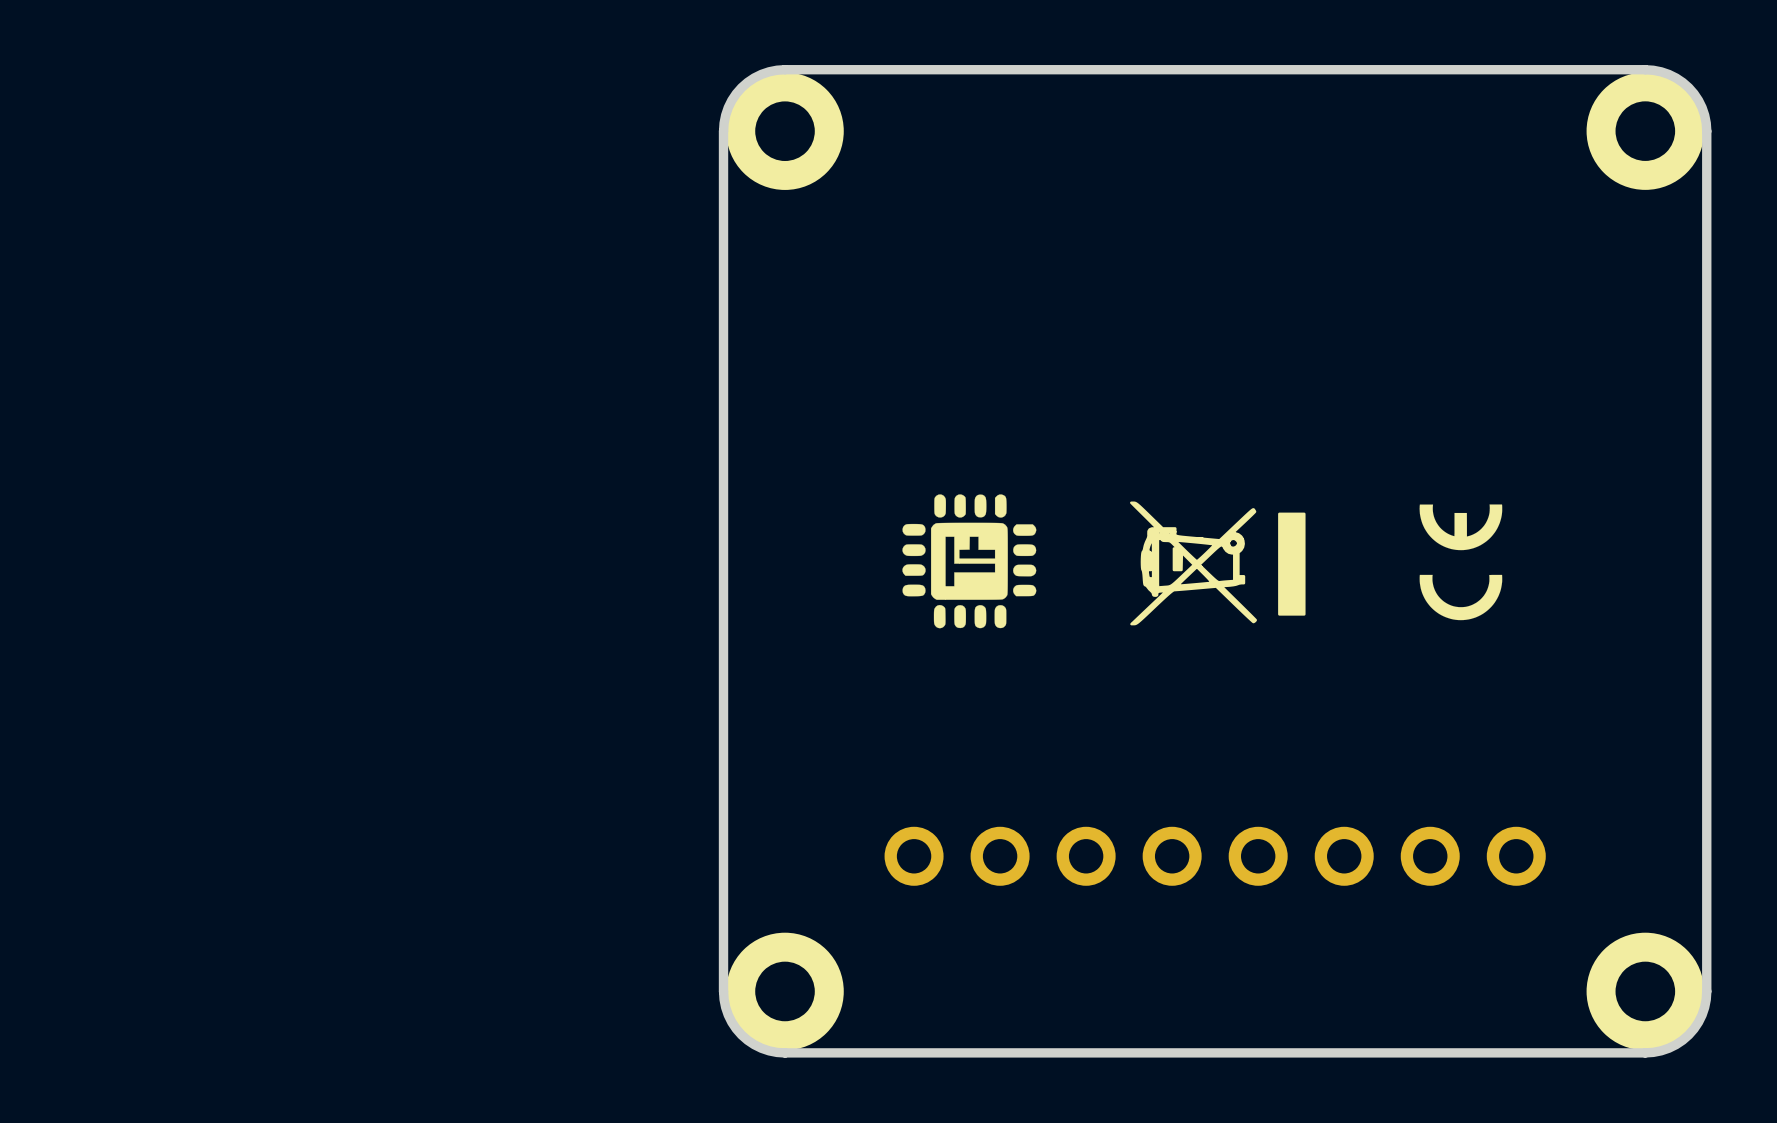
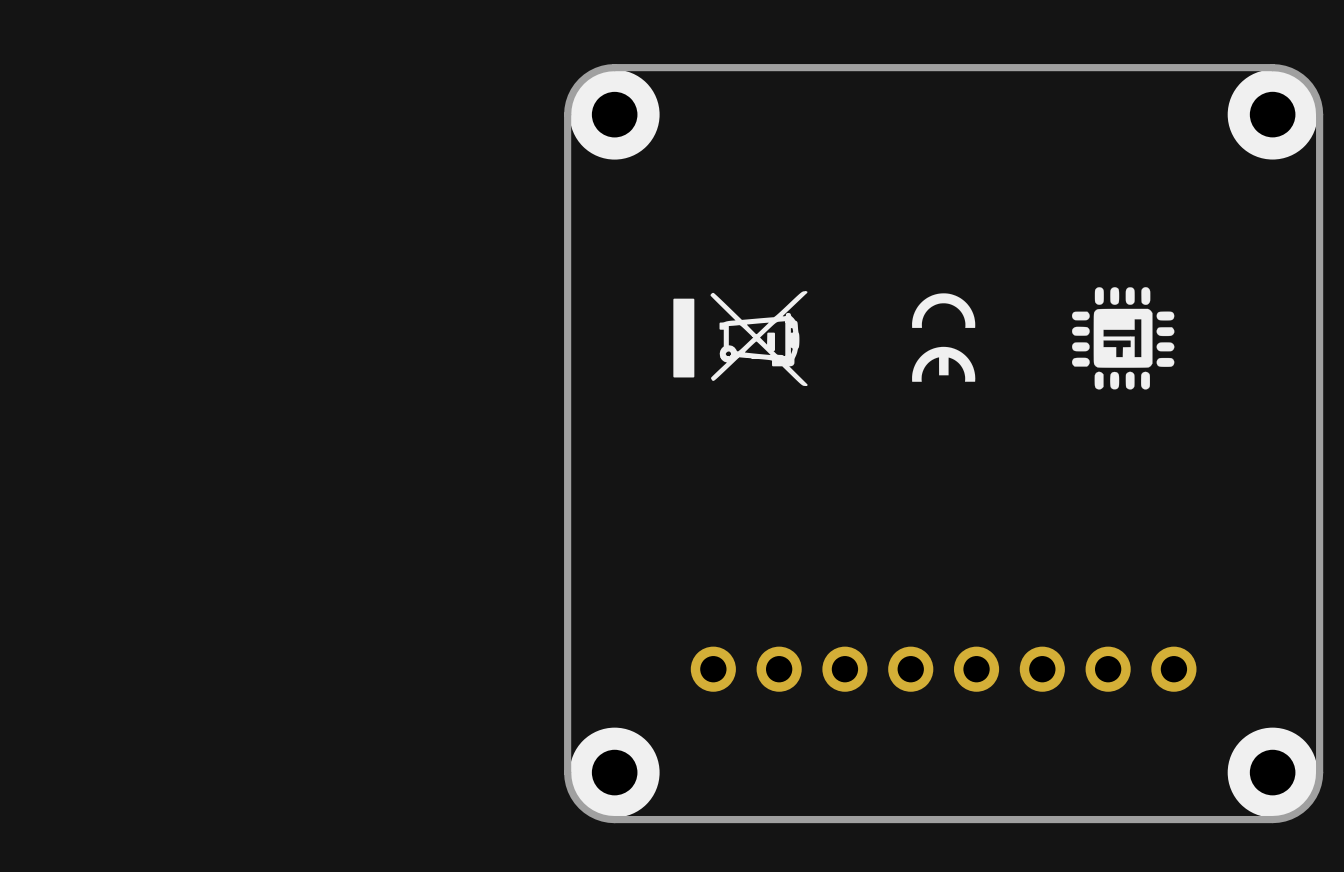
drawing: none -> [1071, 287, 1175, 390]
drawing: none -> [673, 291, 808, 386]
drawing: none -> [912, 293, 976, 382]
drawing: [902, 494, 1037, 629] -> none
drawing: [1130, 501, 1306, 626] -> none
drawing: [1419, 504, 1503, 621] -> none

